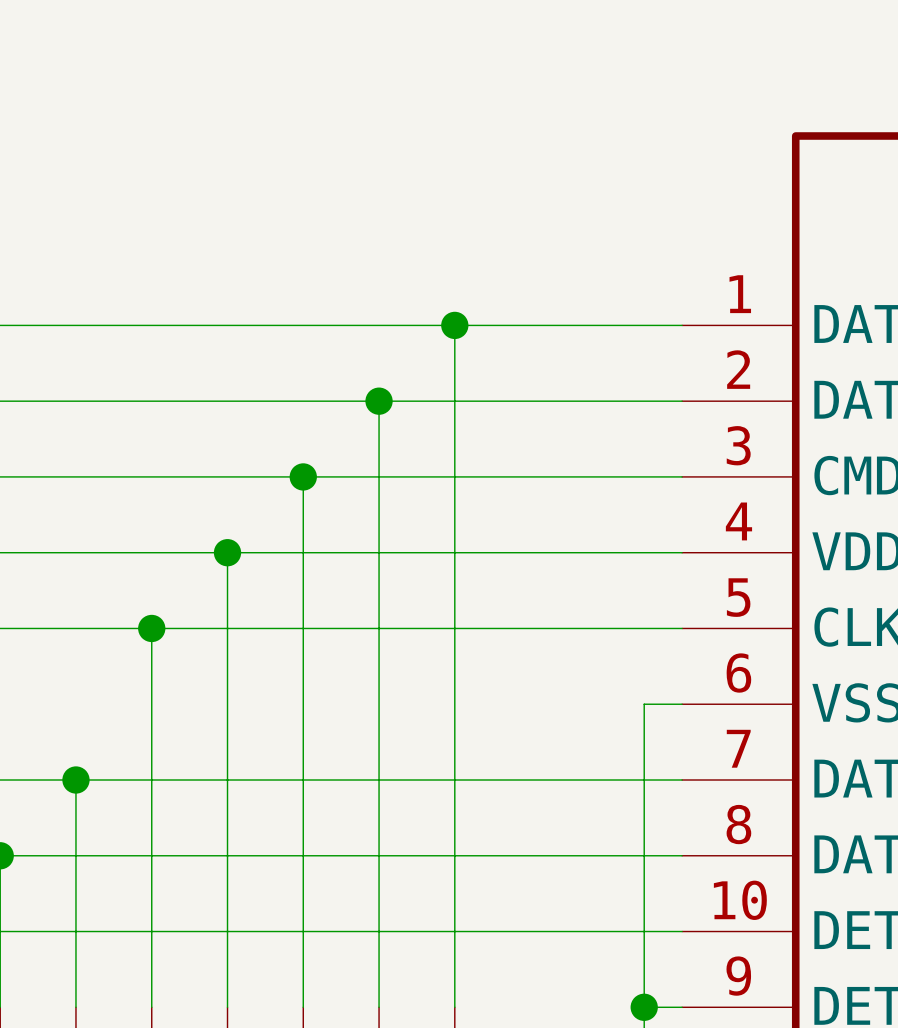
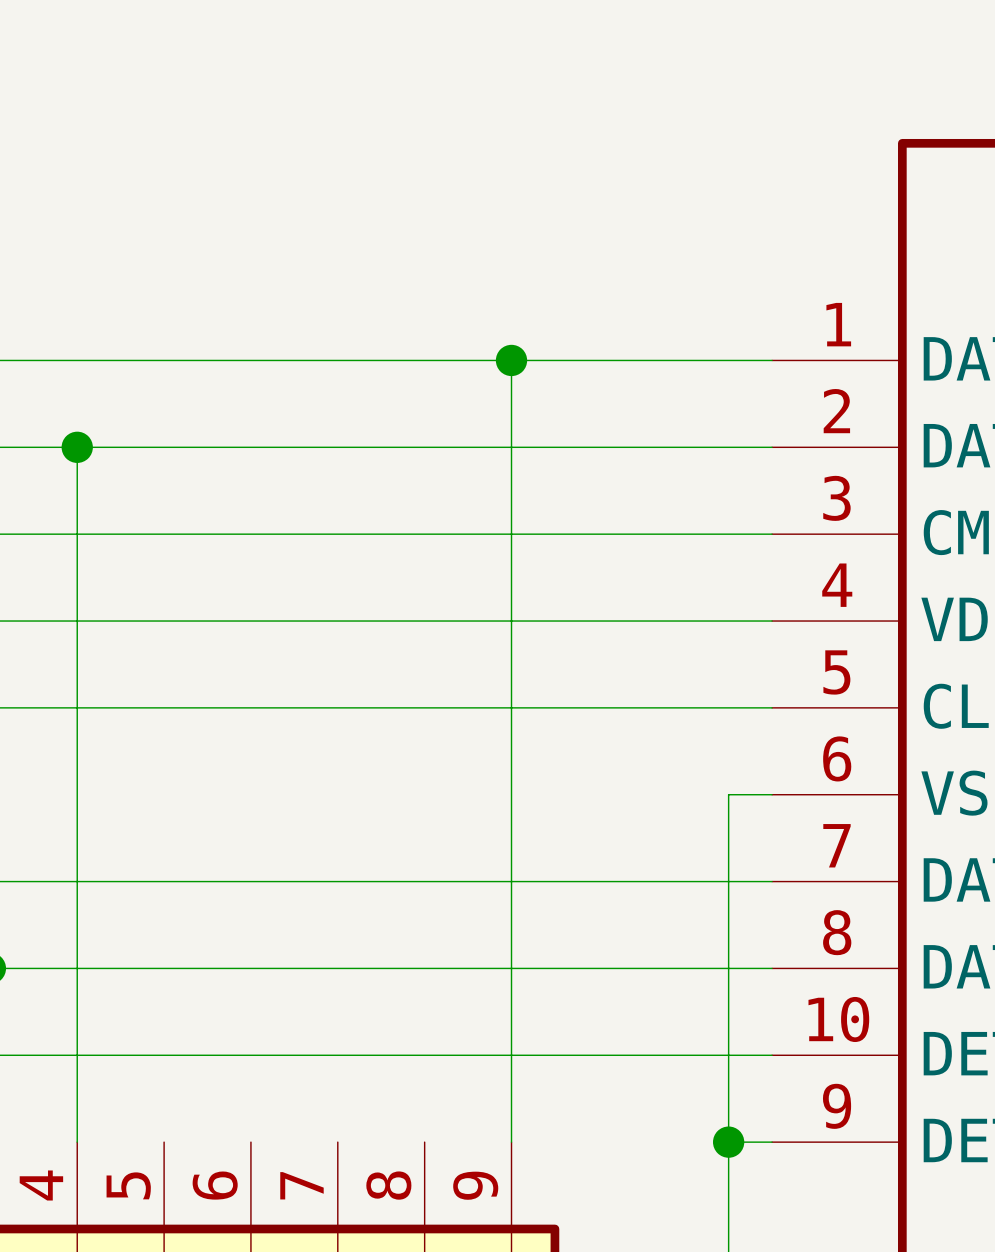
junction: none -> (77, 447)
wire: (379, 401) (379, 1007) -> none
junction: (379, 401) -> none
wire: (303, 476) (303, 1007) -> none
junction: (303, 476) -> none
wire: (227, 552) (227, 1007) -> none
junction: (227, 552) -> none
wire: (151, 628) (151, 1007) -> (77, 447) (77, 881)
junction: (151, 628) -> none
junction: (75, 780) -> none

